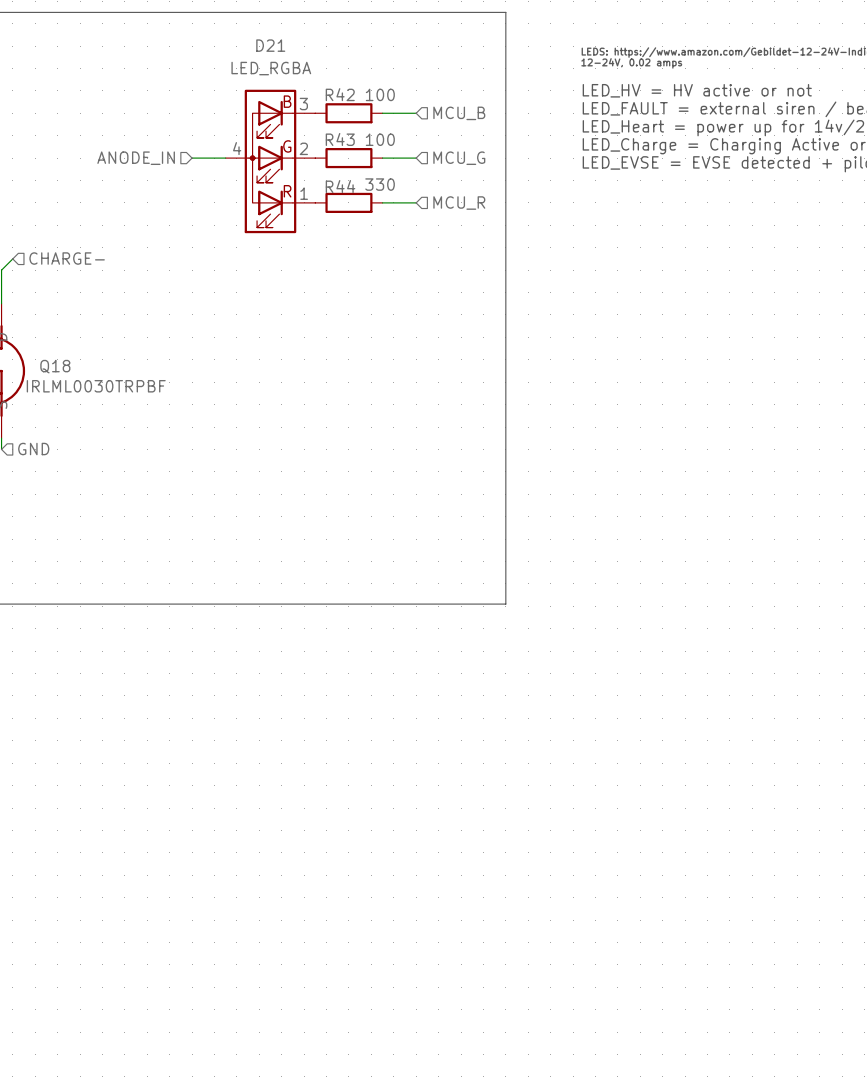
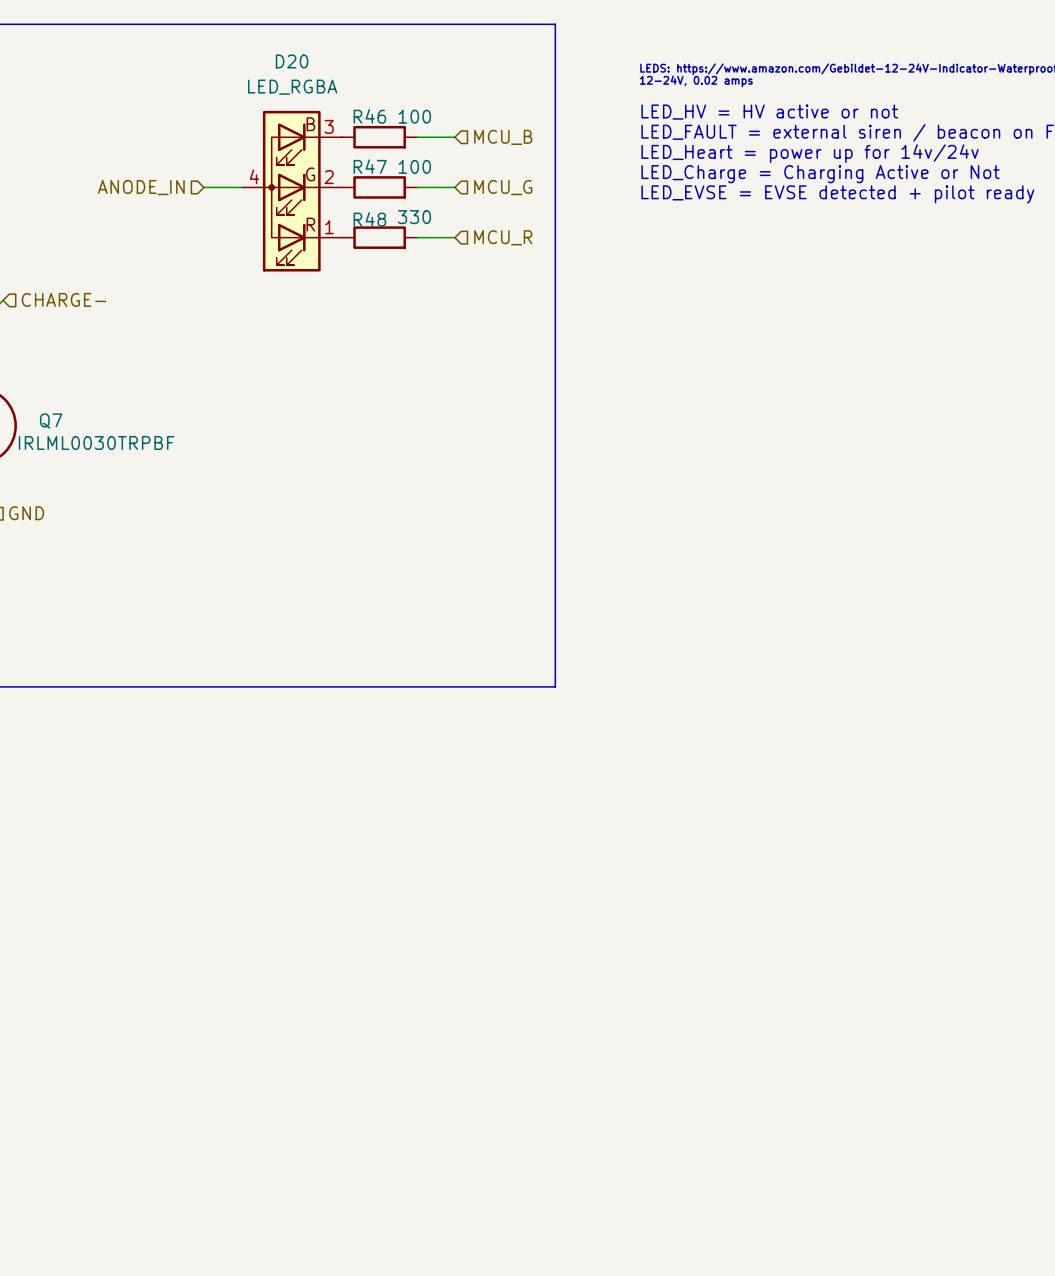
D21 name: D21 (270, 45) -> D20 (292, 61)
R42 name: R42 (340, 94) -> R46 (369, 116)
R43 name: R43 (340, 139) -> R47 (370, 166)
R44 name: R44 (340, 186) -> R48 (369, 219)
Q18 name: Q18 (55, 366) -> Q7 (51, 420)

